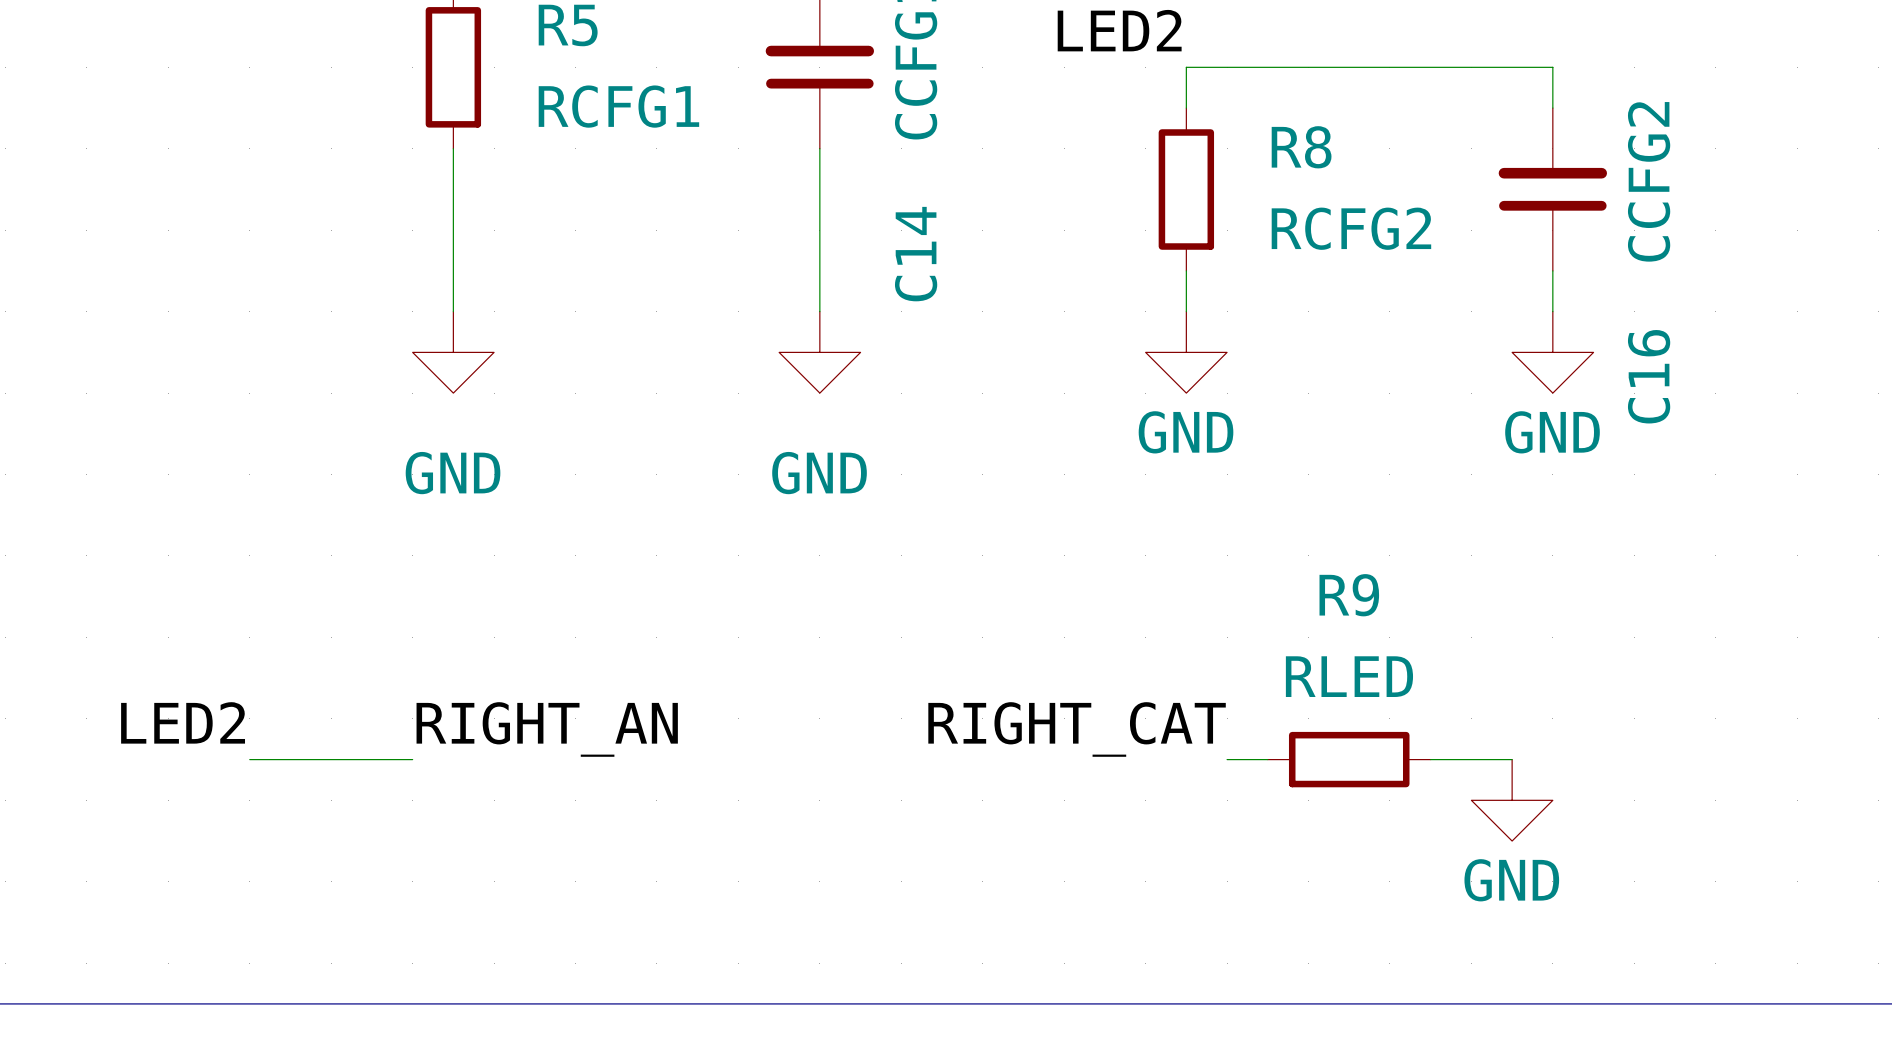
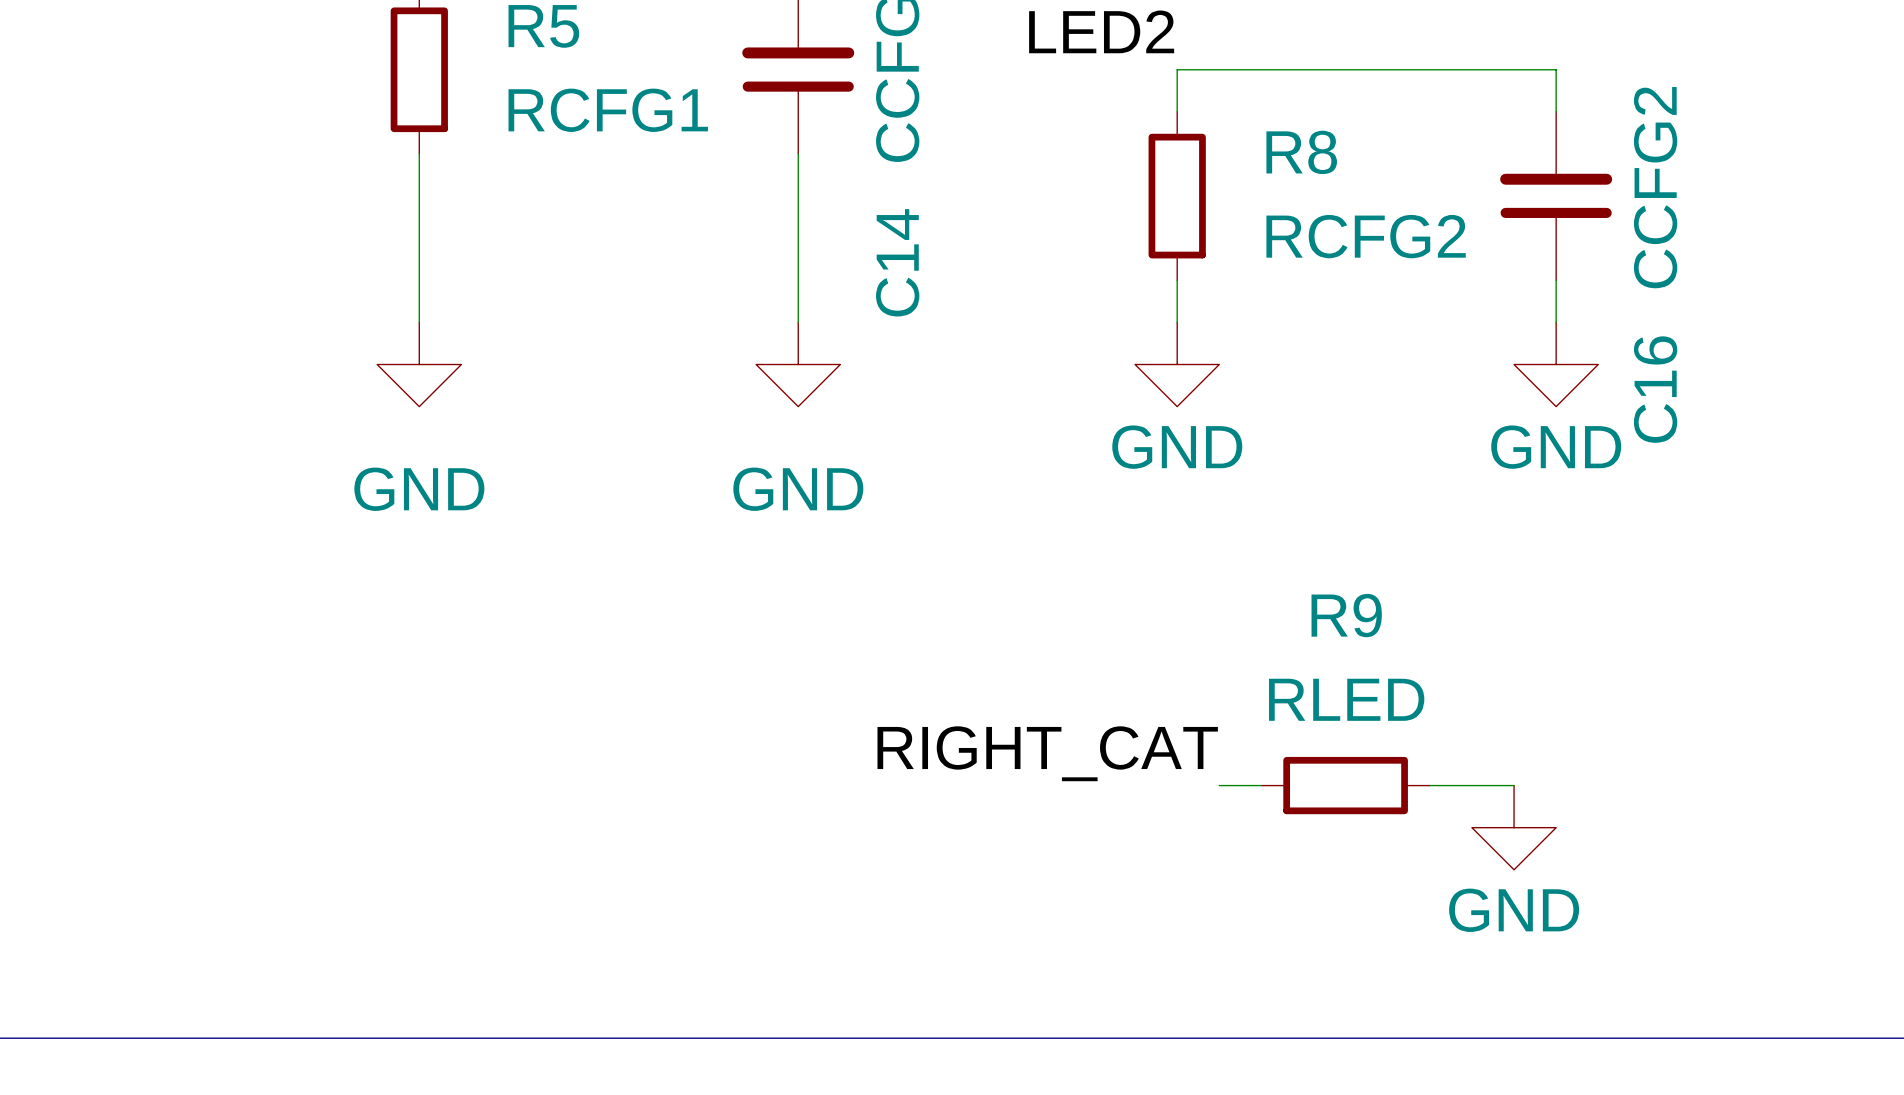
label: LED2 (183, 722) -> none
label: RIGHT_AN (547, 729) -> none
wire: (249, 759) (412, 759) -> none

